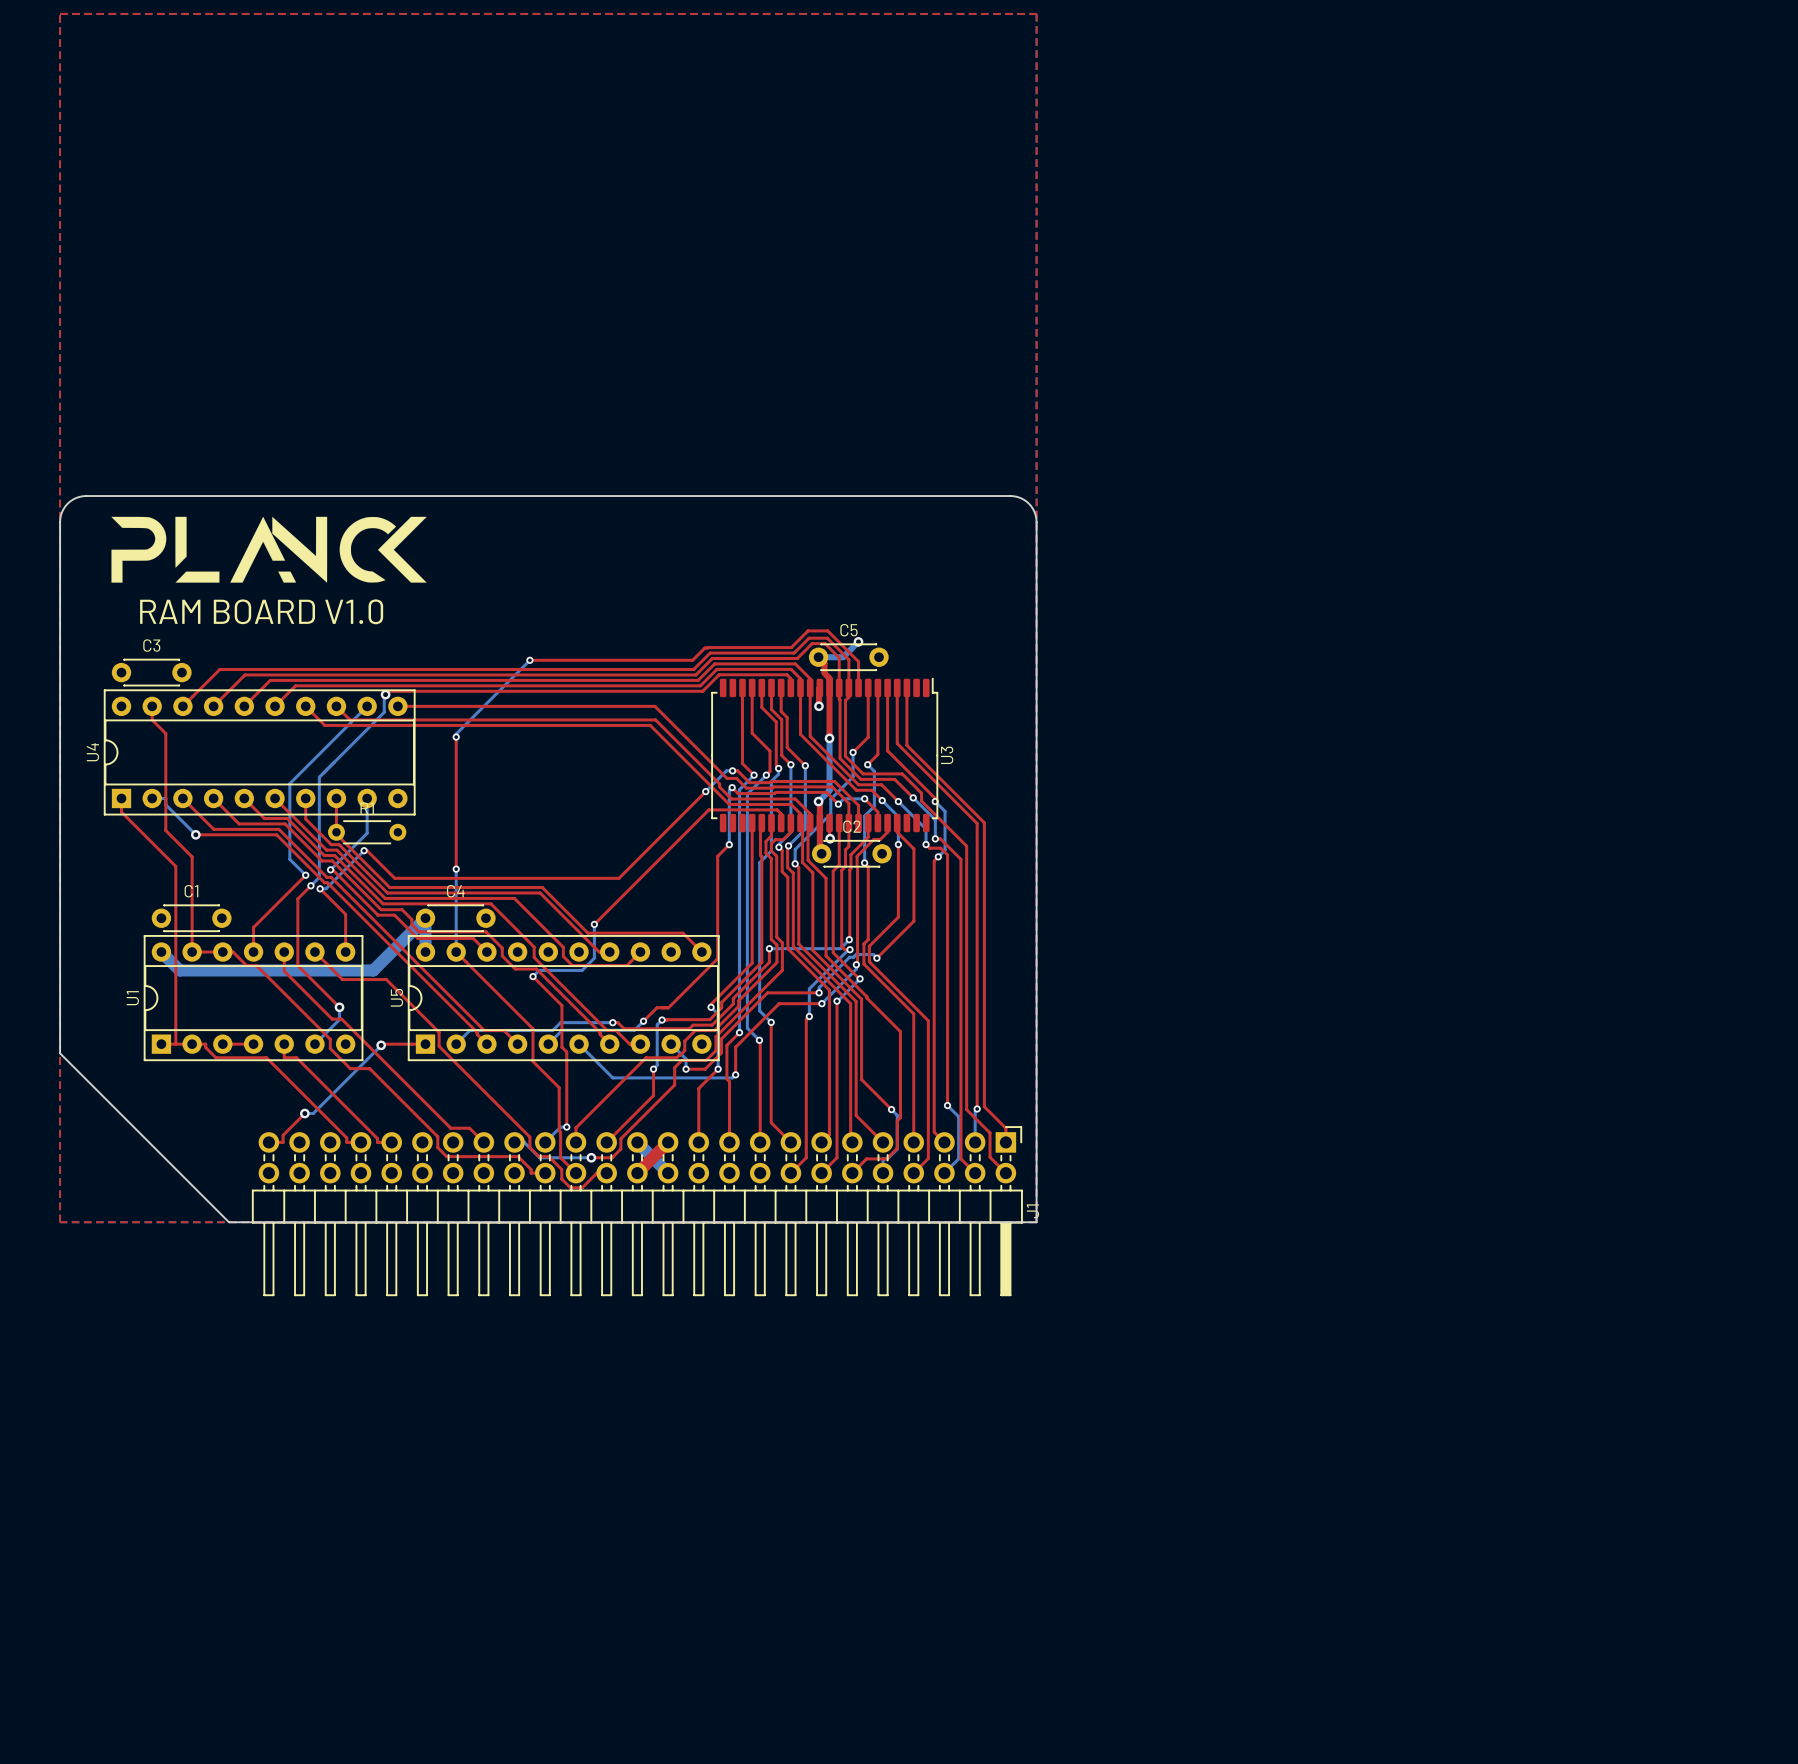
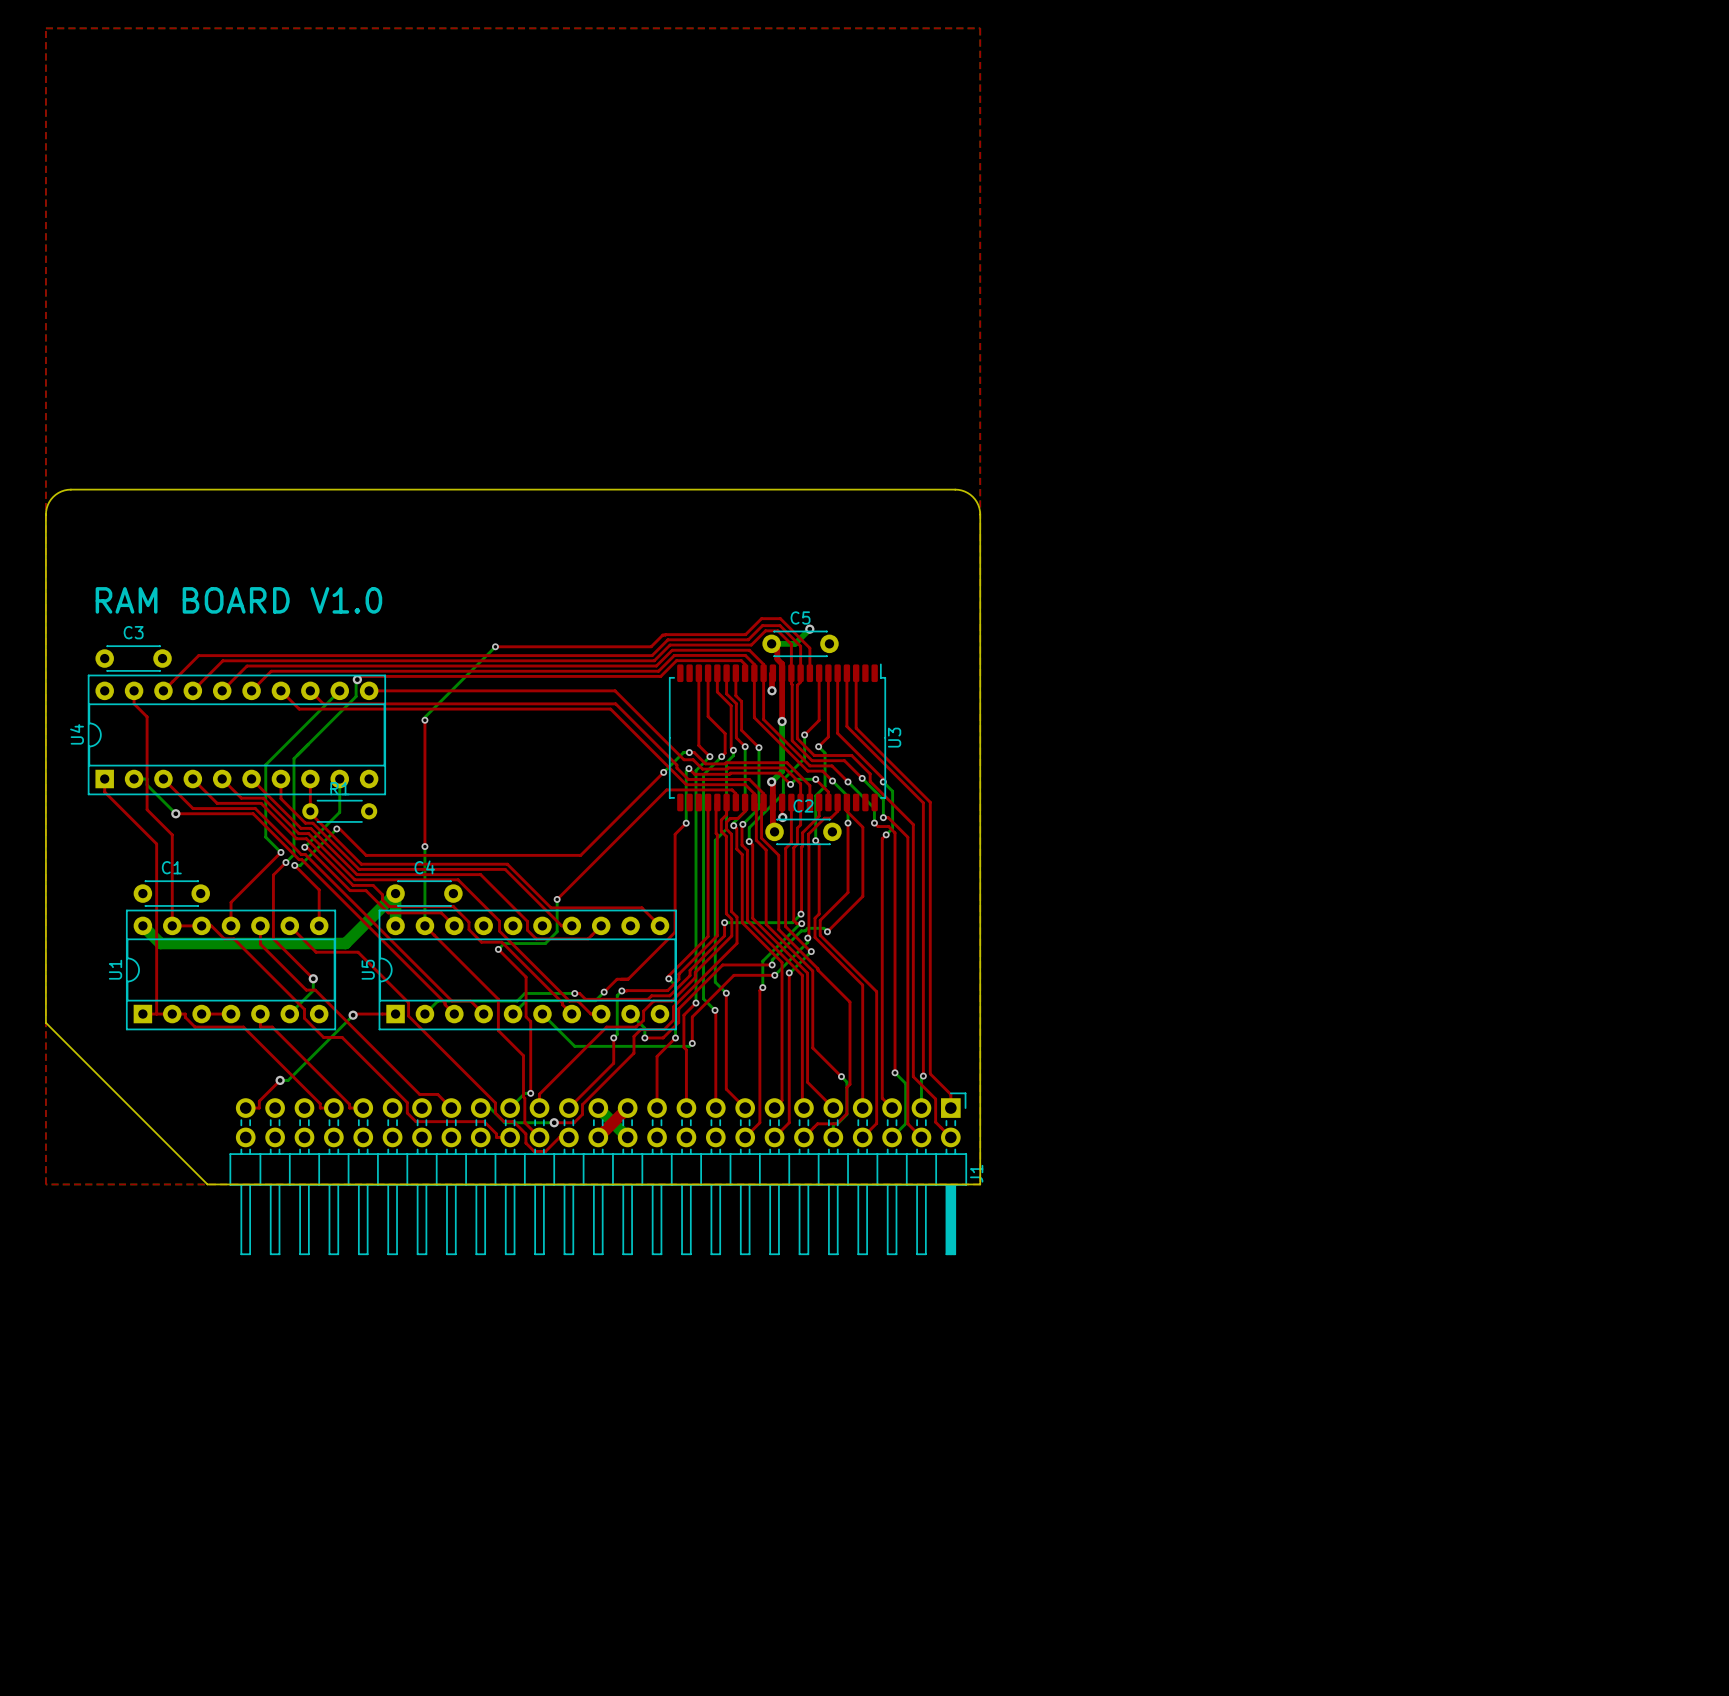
drawing: [111, 516, 427, 583] -> none

